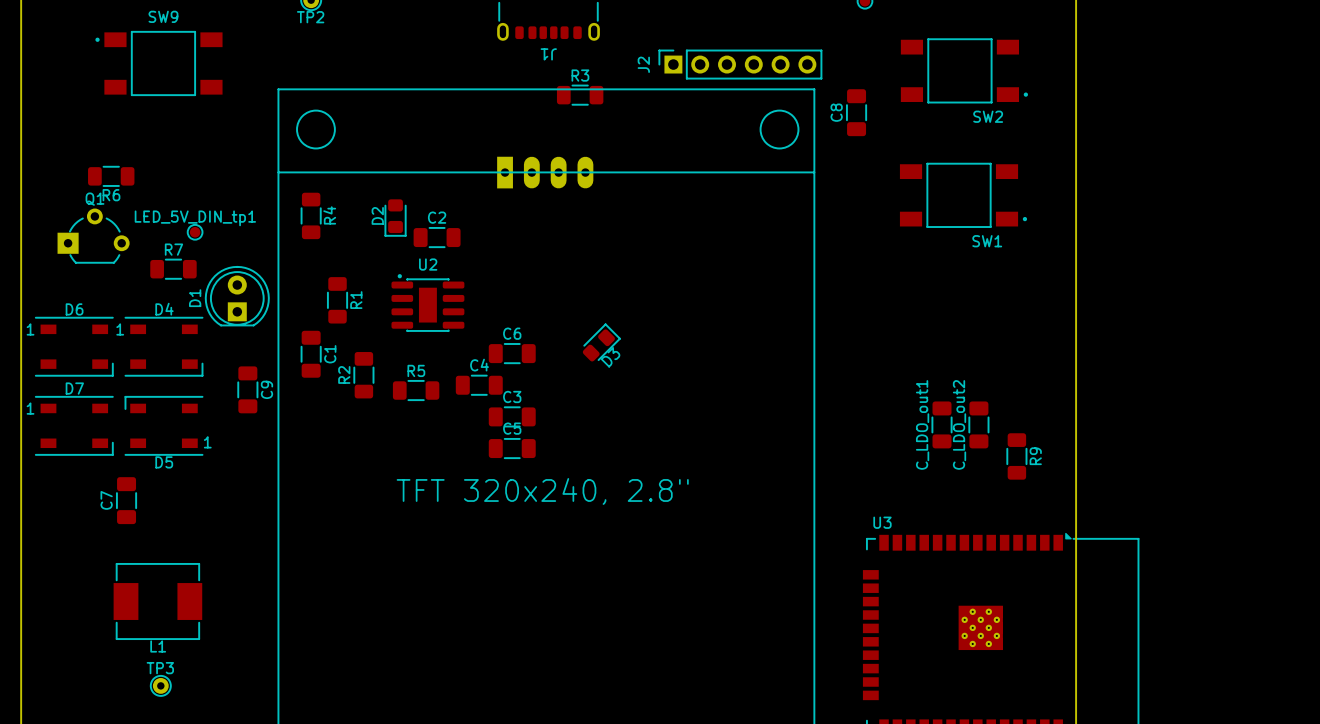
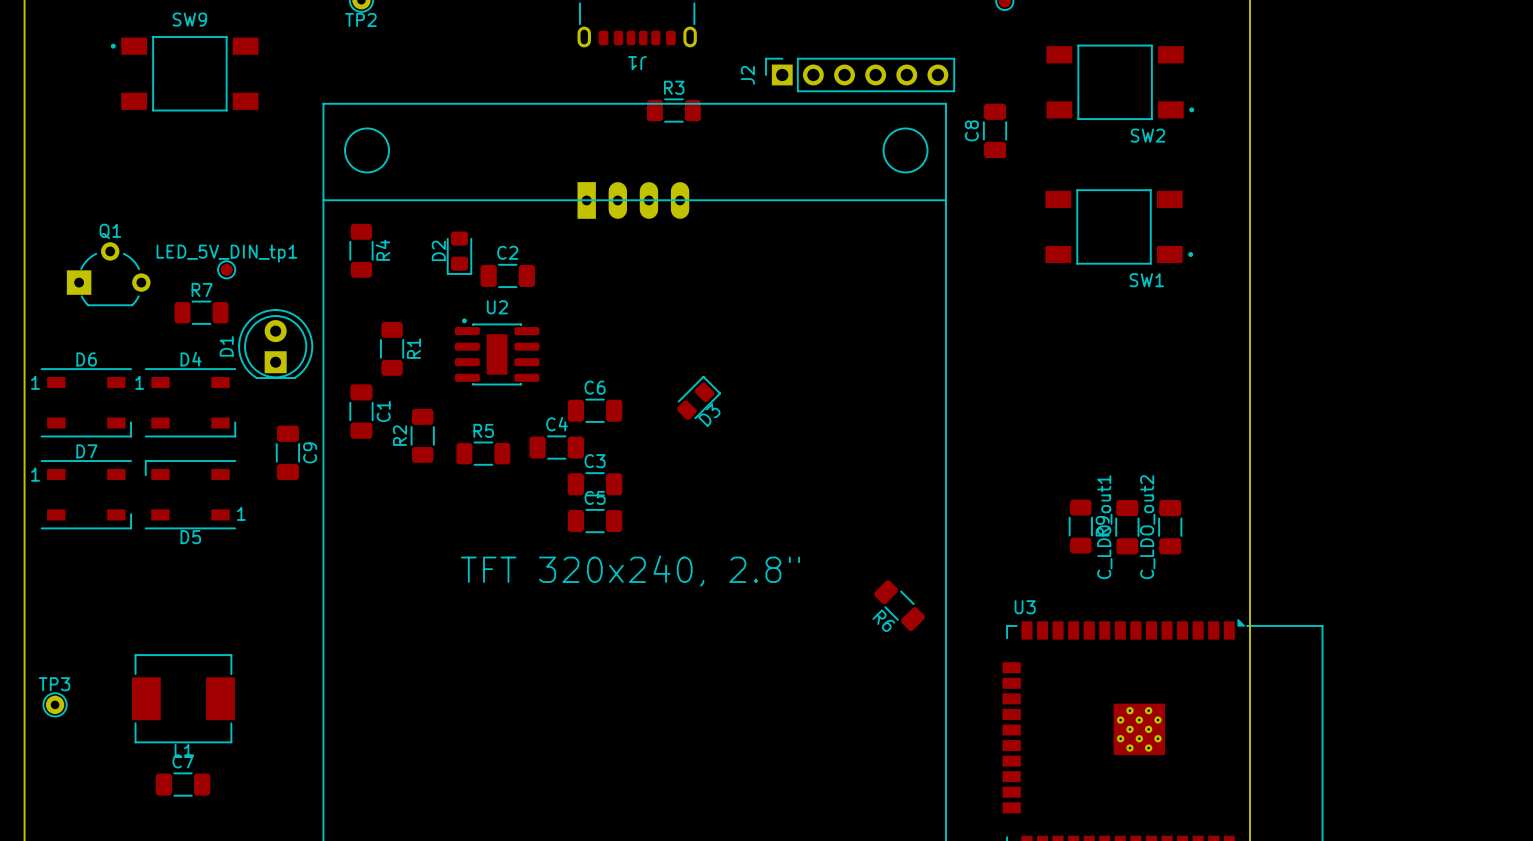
R6 rotation: 0° (111, 176) -> 45° clockwise (899, 605)
R6 position: (111, 176) -> (899, 605)
C_LDO_out1 position: (942, 424) -> (1127, 527)
C_LDO_out2 position: (978, 424) -> (1170, 527)
R9 position: (1016, 456) -> (1080, 526)
C7 rotation: 0° (126, 500) -> 90° clockwise (182, 784)
C7 position: (126, 500) -> (182, 784)
TP3 position: (160, 685) -> (55, 704)

